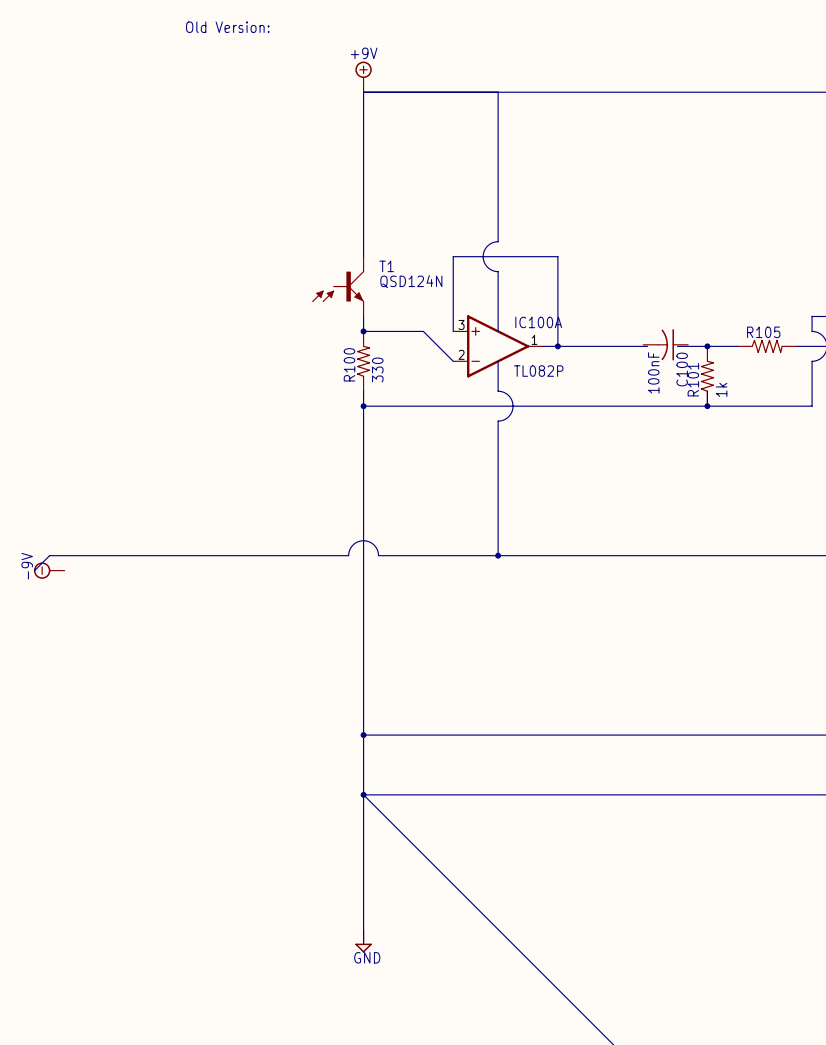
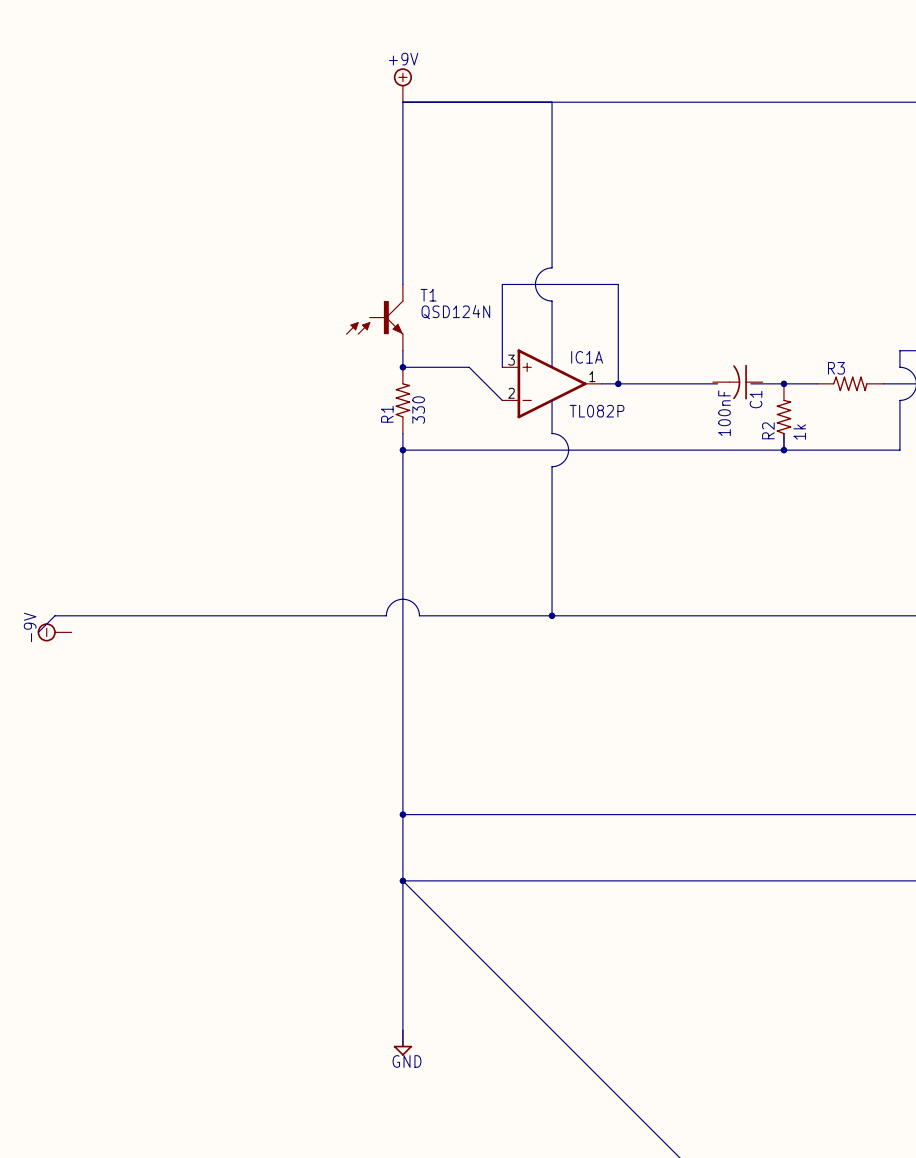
text: Old Version: (227, 27) -> none
IC100A name: IC100A (538, 322) -> IC1A (587, 357)
R105 name: R105 (763, 332) -> R3 (836, 368)
R100 name: R100 (349, 364) -> R1 (387, 414)
C100 name: C100 (682, 369) -> C1 (756, 399)
R101 name: R101 (693, 379) -> R2 (768, 430)

